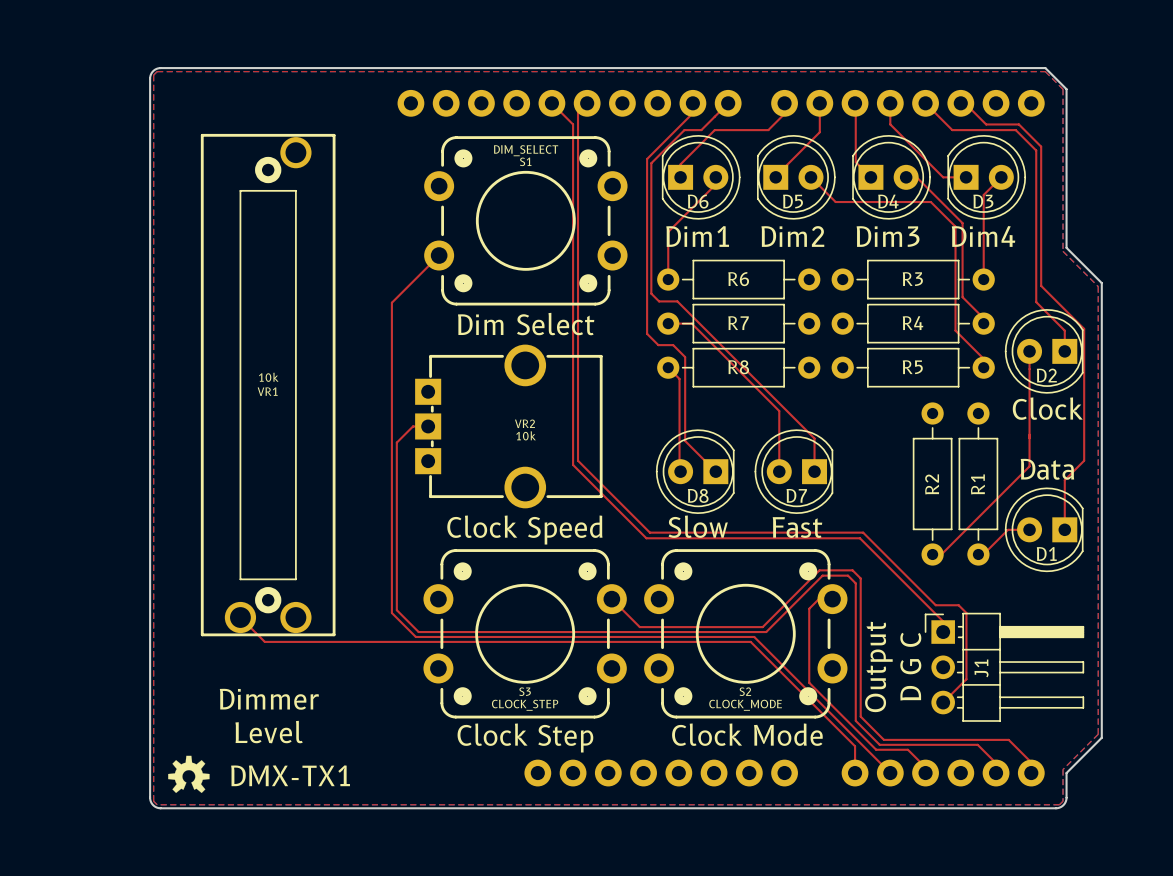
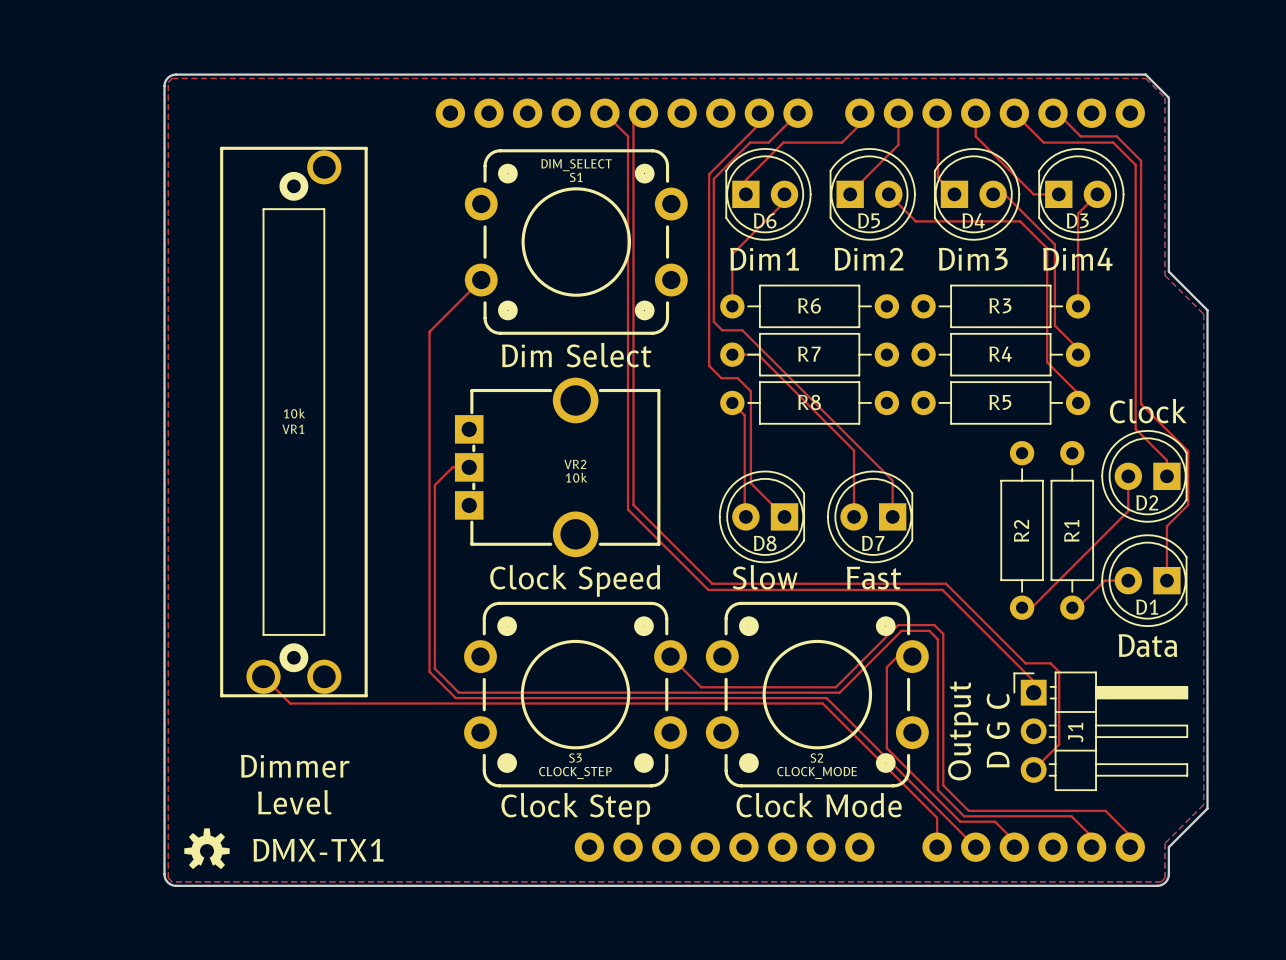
top track: (1041, 285) (1084, 328) (1084, 411) -> (1141, 313) (1141, 404) (1188, 451)
top track: (1036, 302) (1064, 330) (1064, 351) -> (1135, 331) (1135, 429) (1166, 460) (1166, 476)
top track: (1029, 351) (1029, 434) -> none
D2 position: (1044, 351) -> (1144, 476)
text position: Clock (1047, 408) -> Clock (1148, 411)
text position: Data (1047, 469) -> Data (1147, 645)

